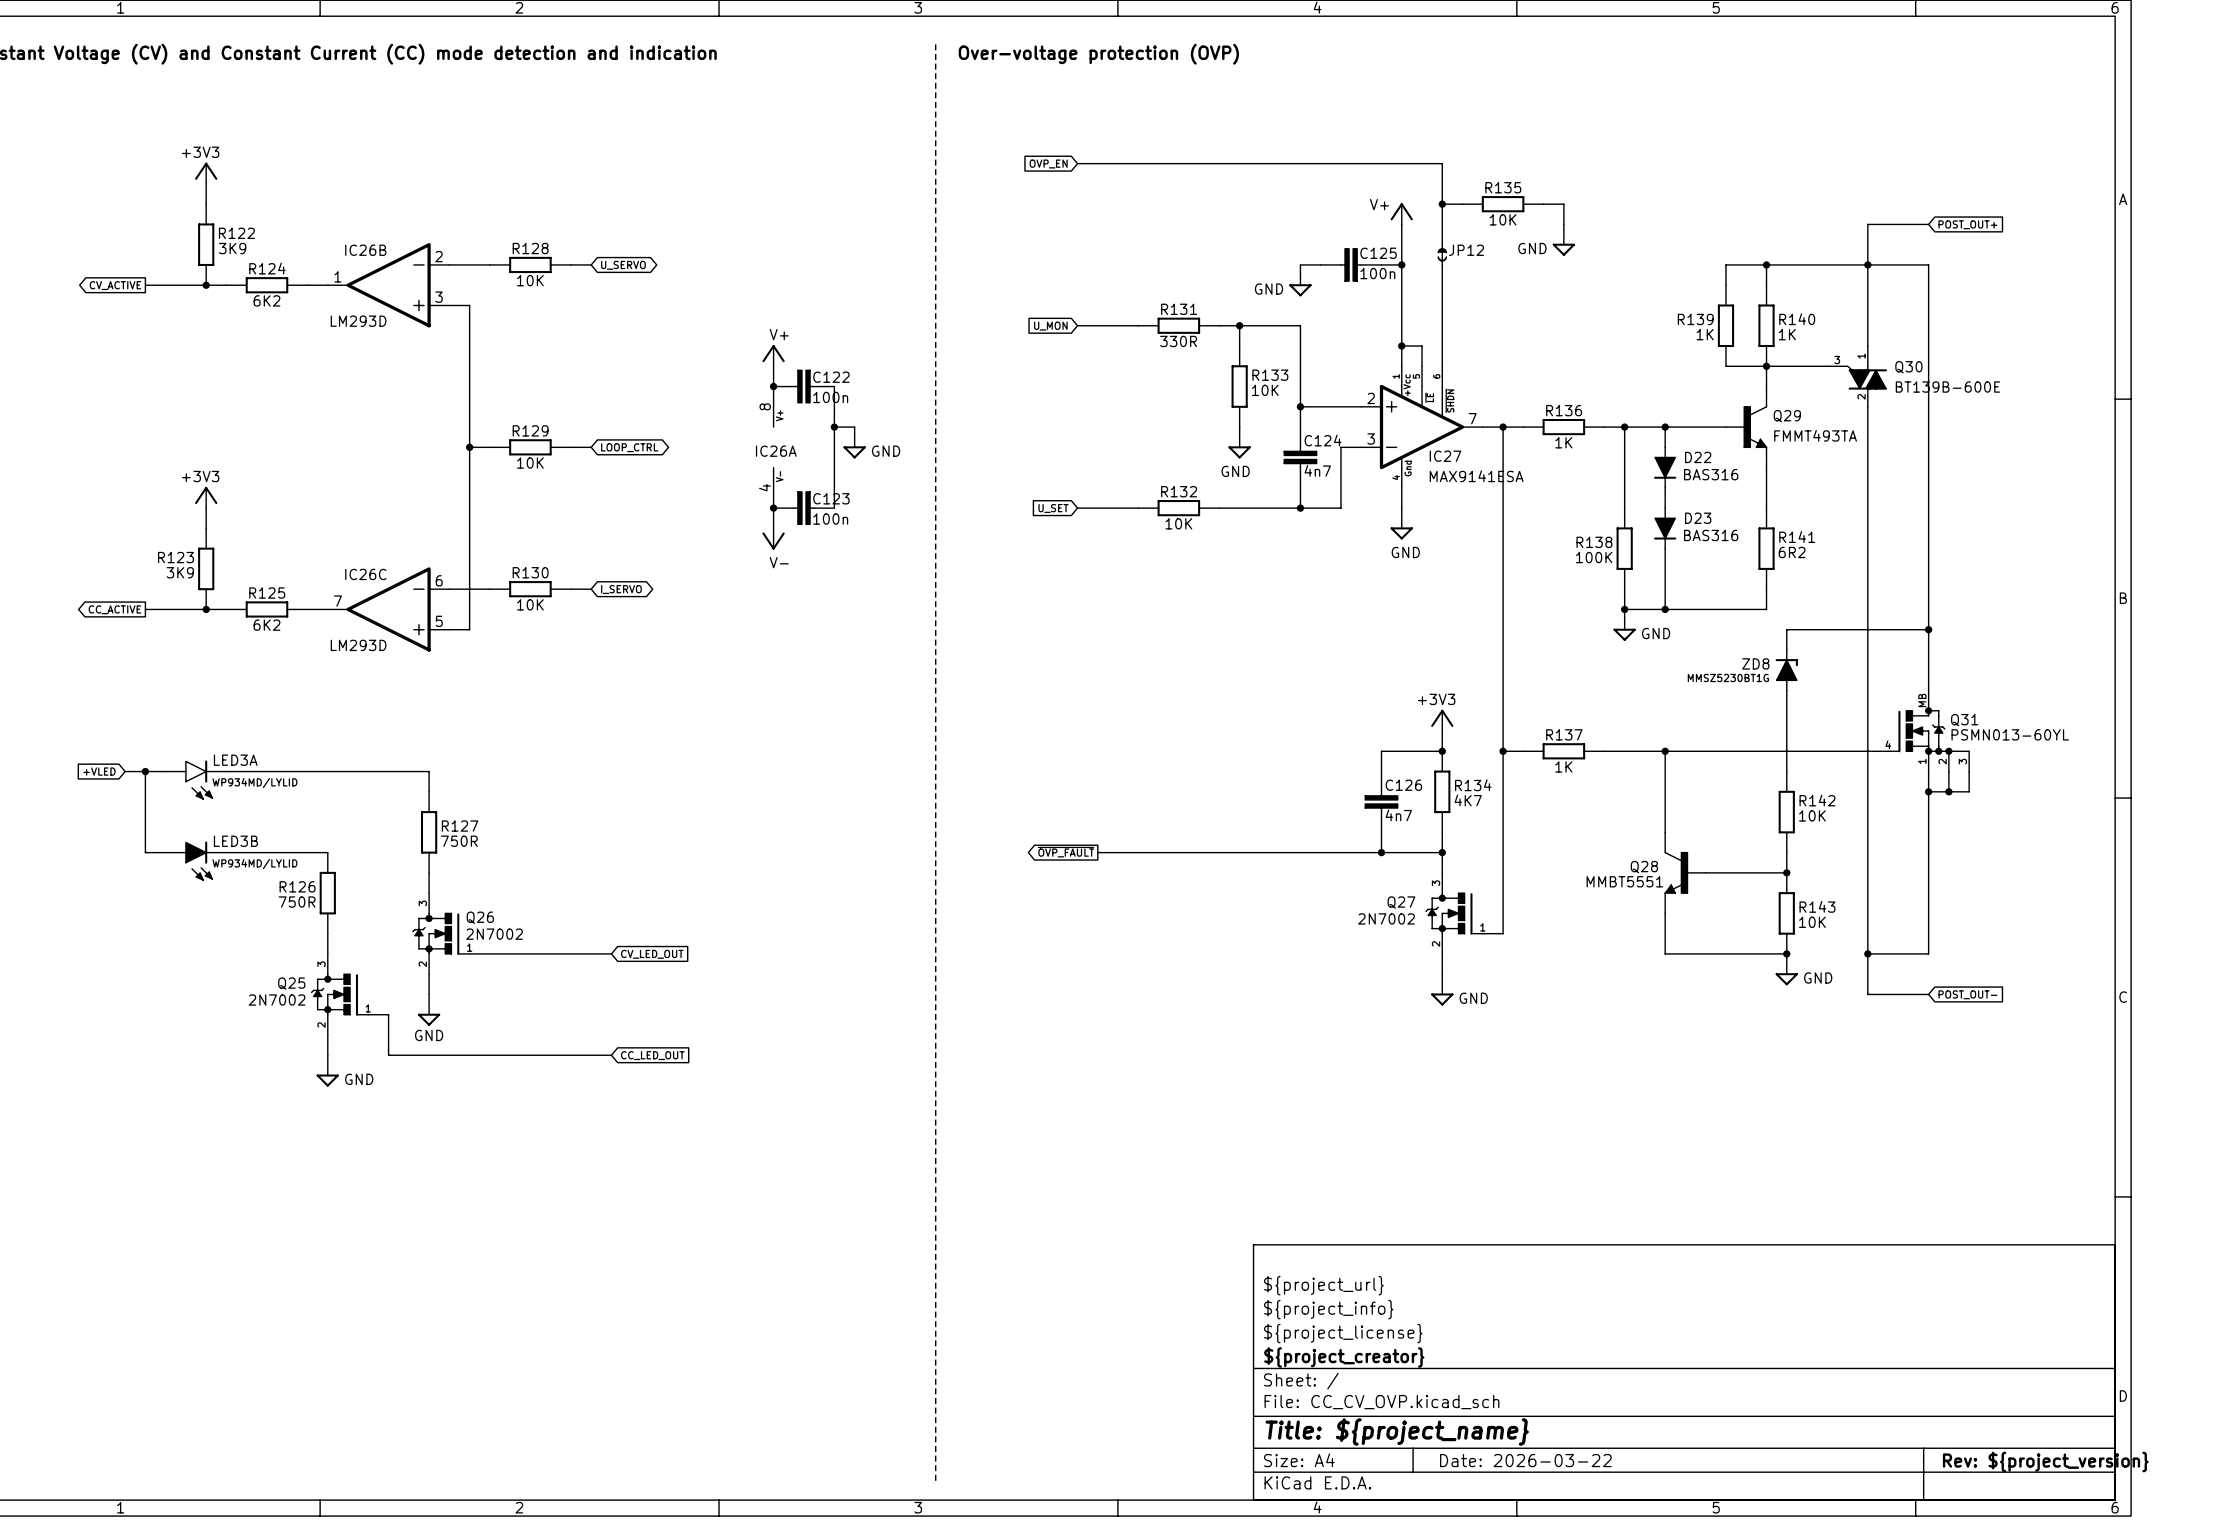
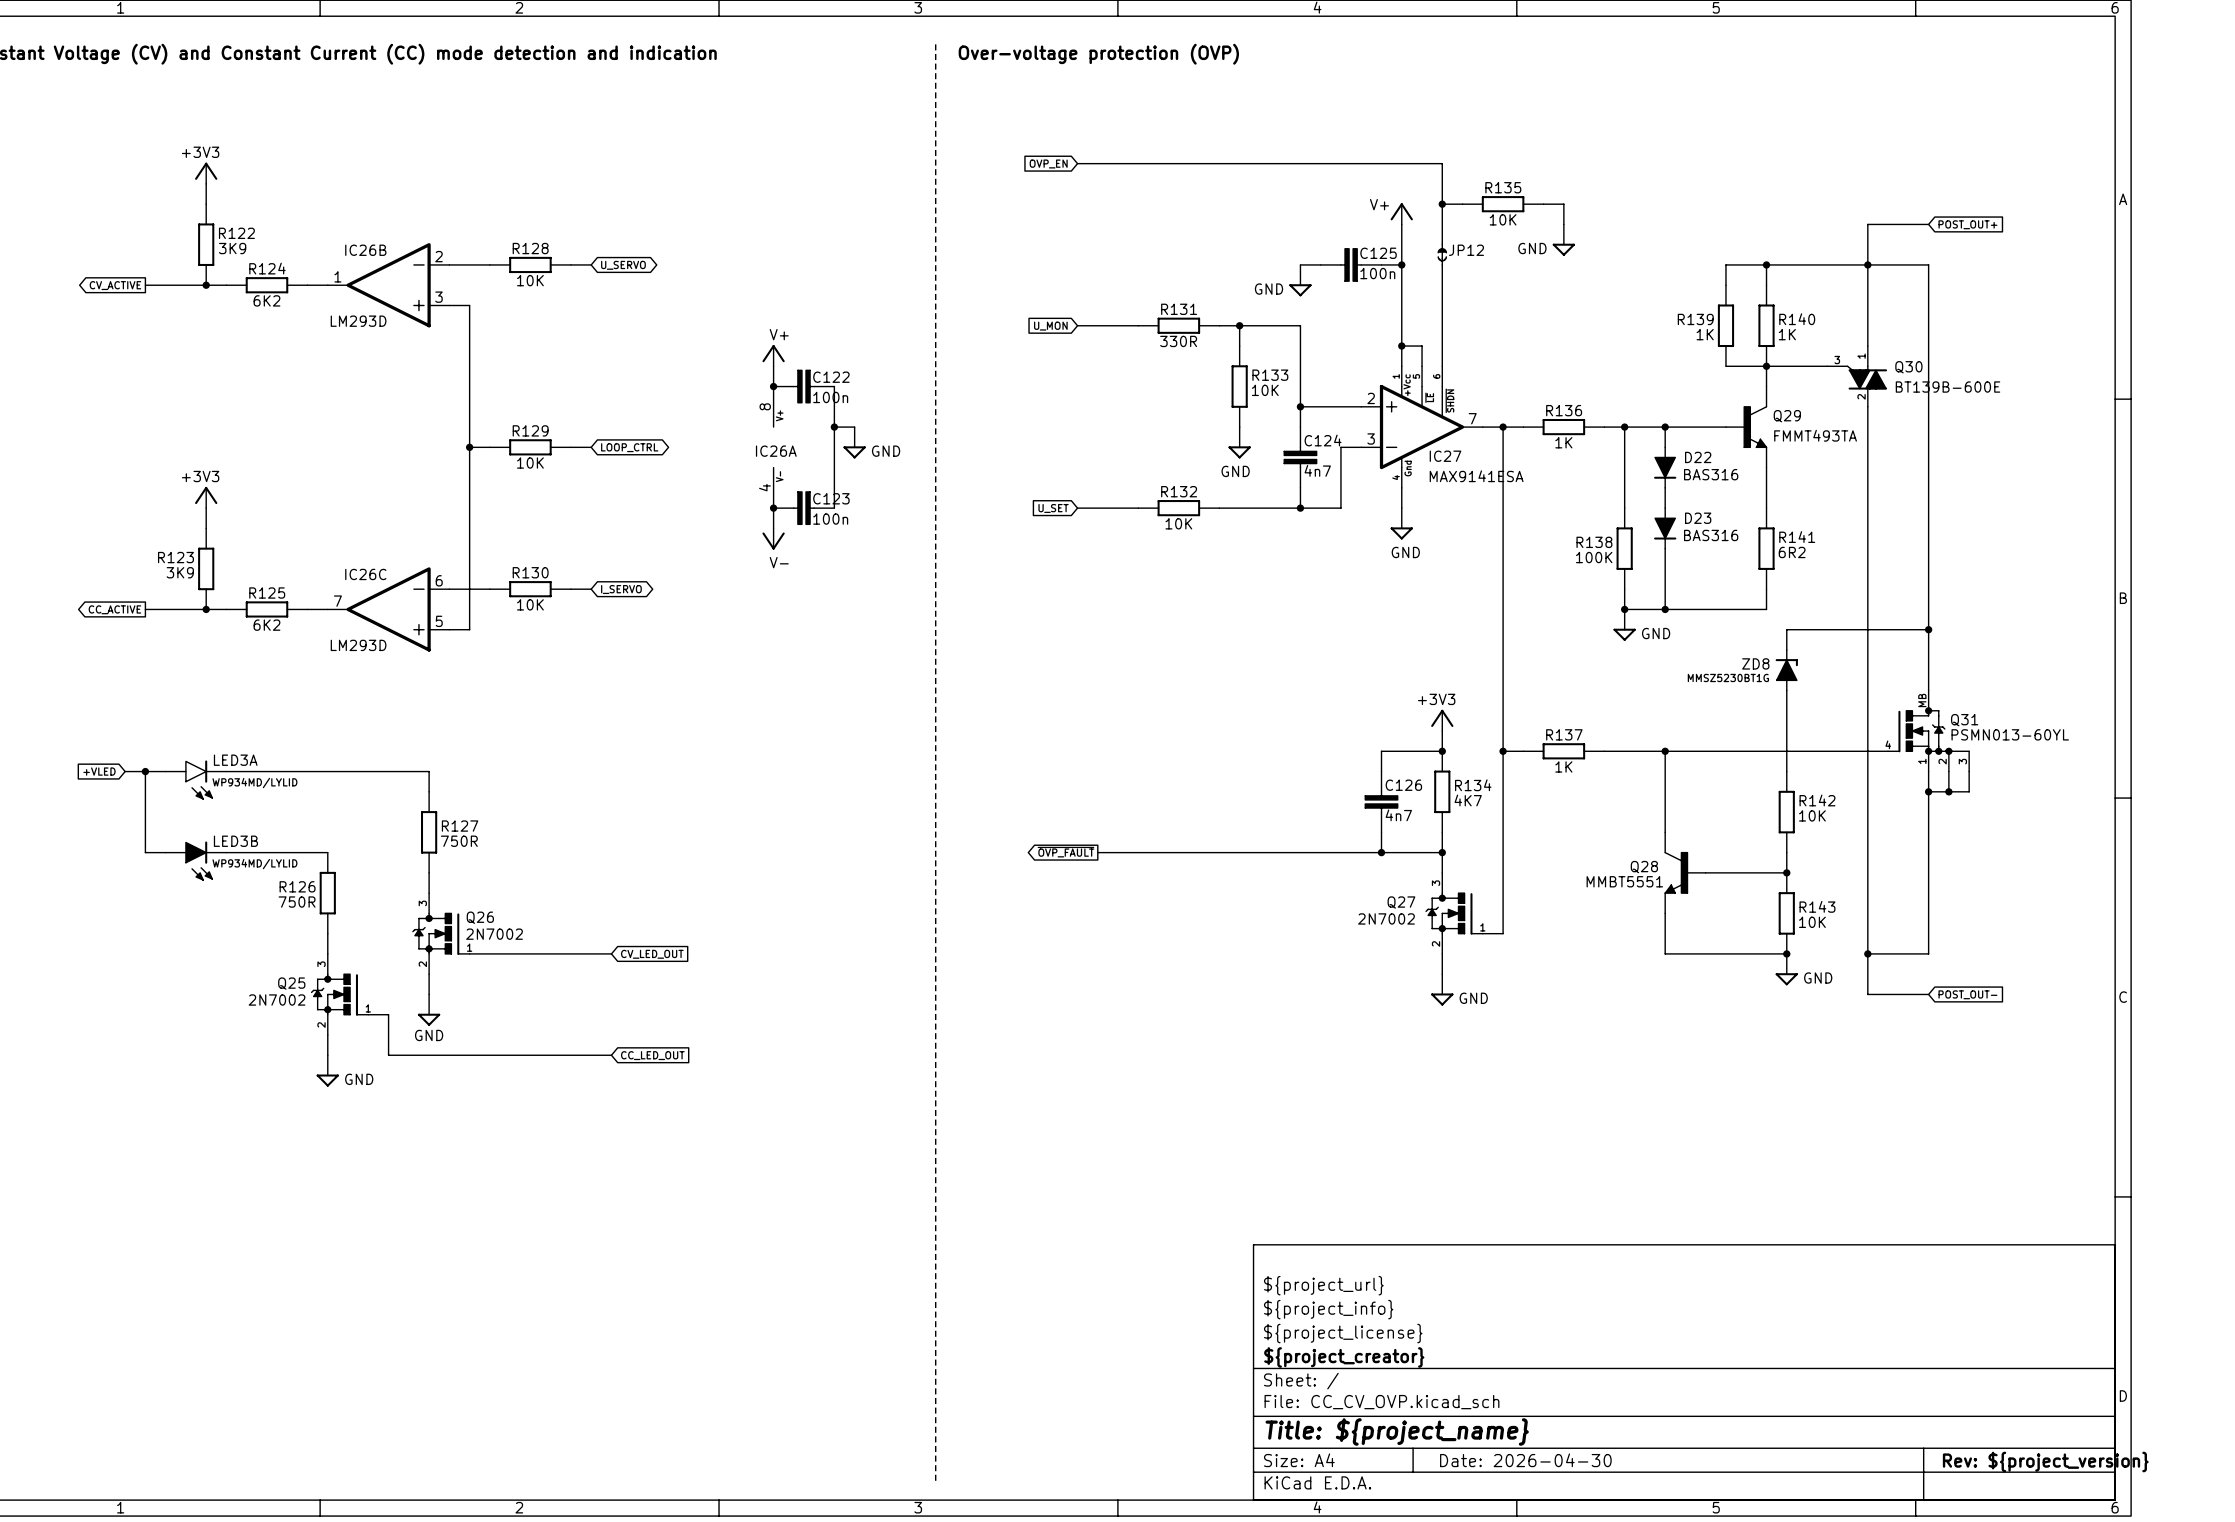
title block: Date: 2026-03-22 (1525, 1460) -> Date: 2026-04-30 (1525, 1460)

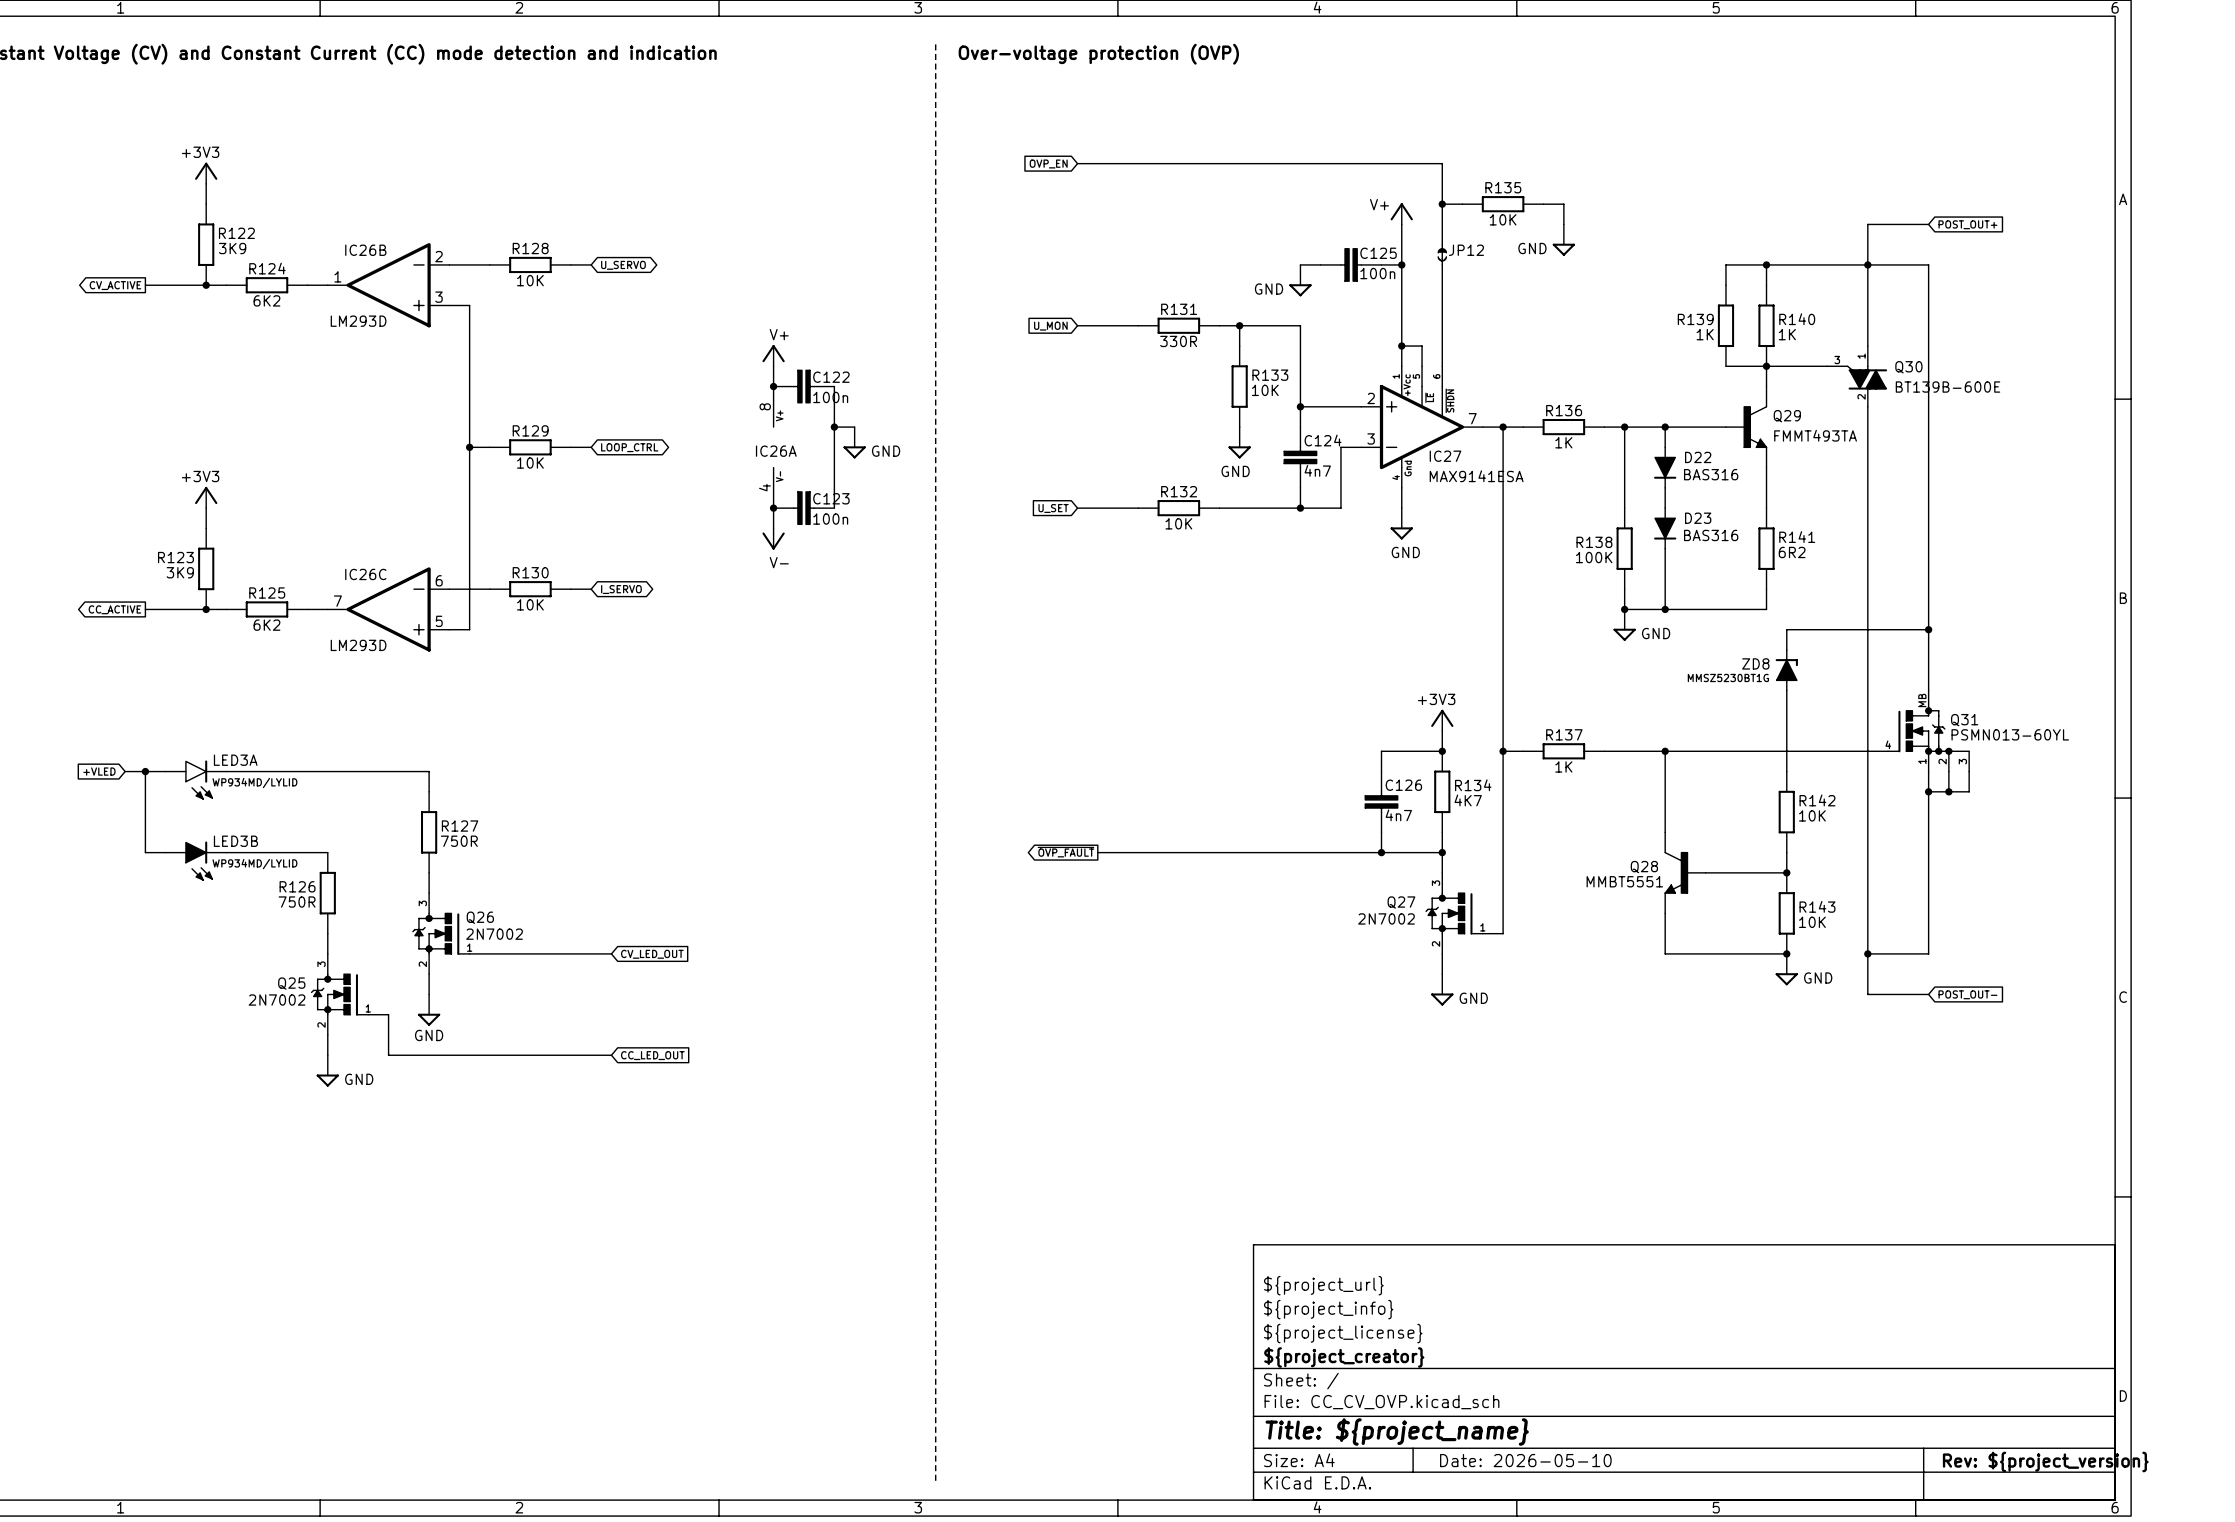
title block: Date: 2026-04-30 (1525, 1460) -> Date: 2026-05-10 (1525, 1460)

